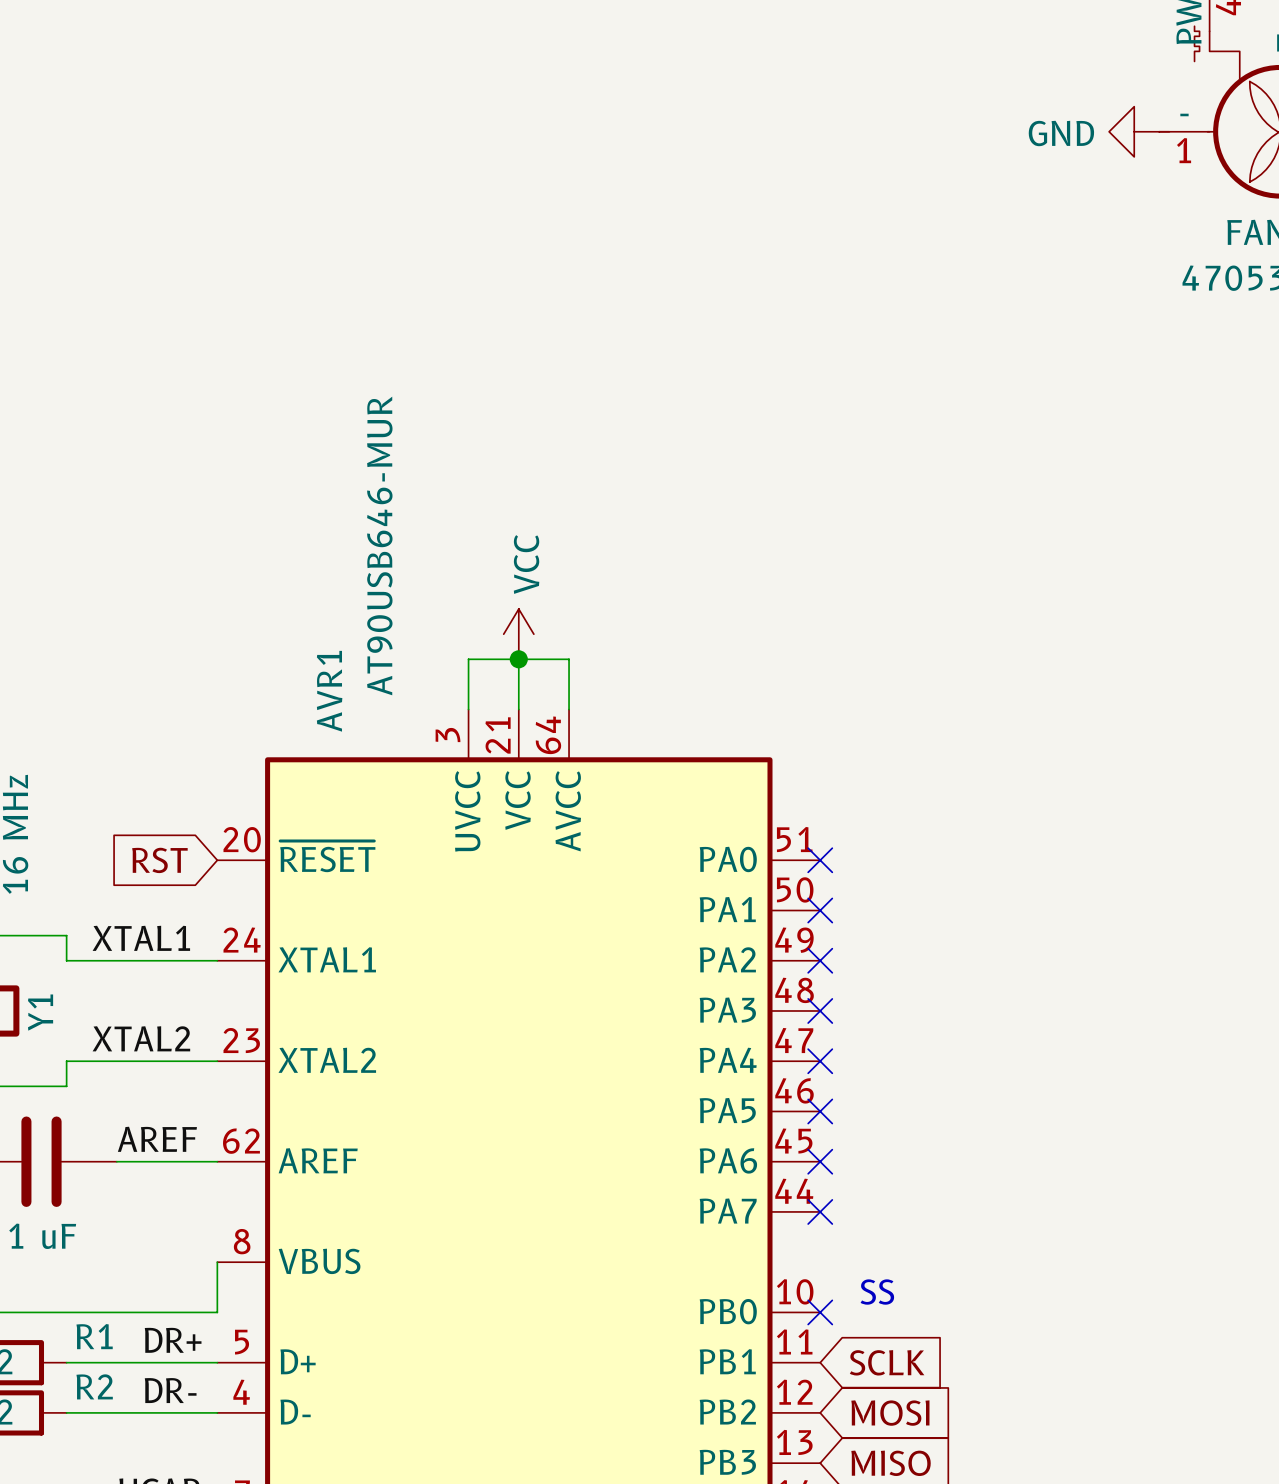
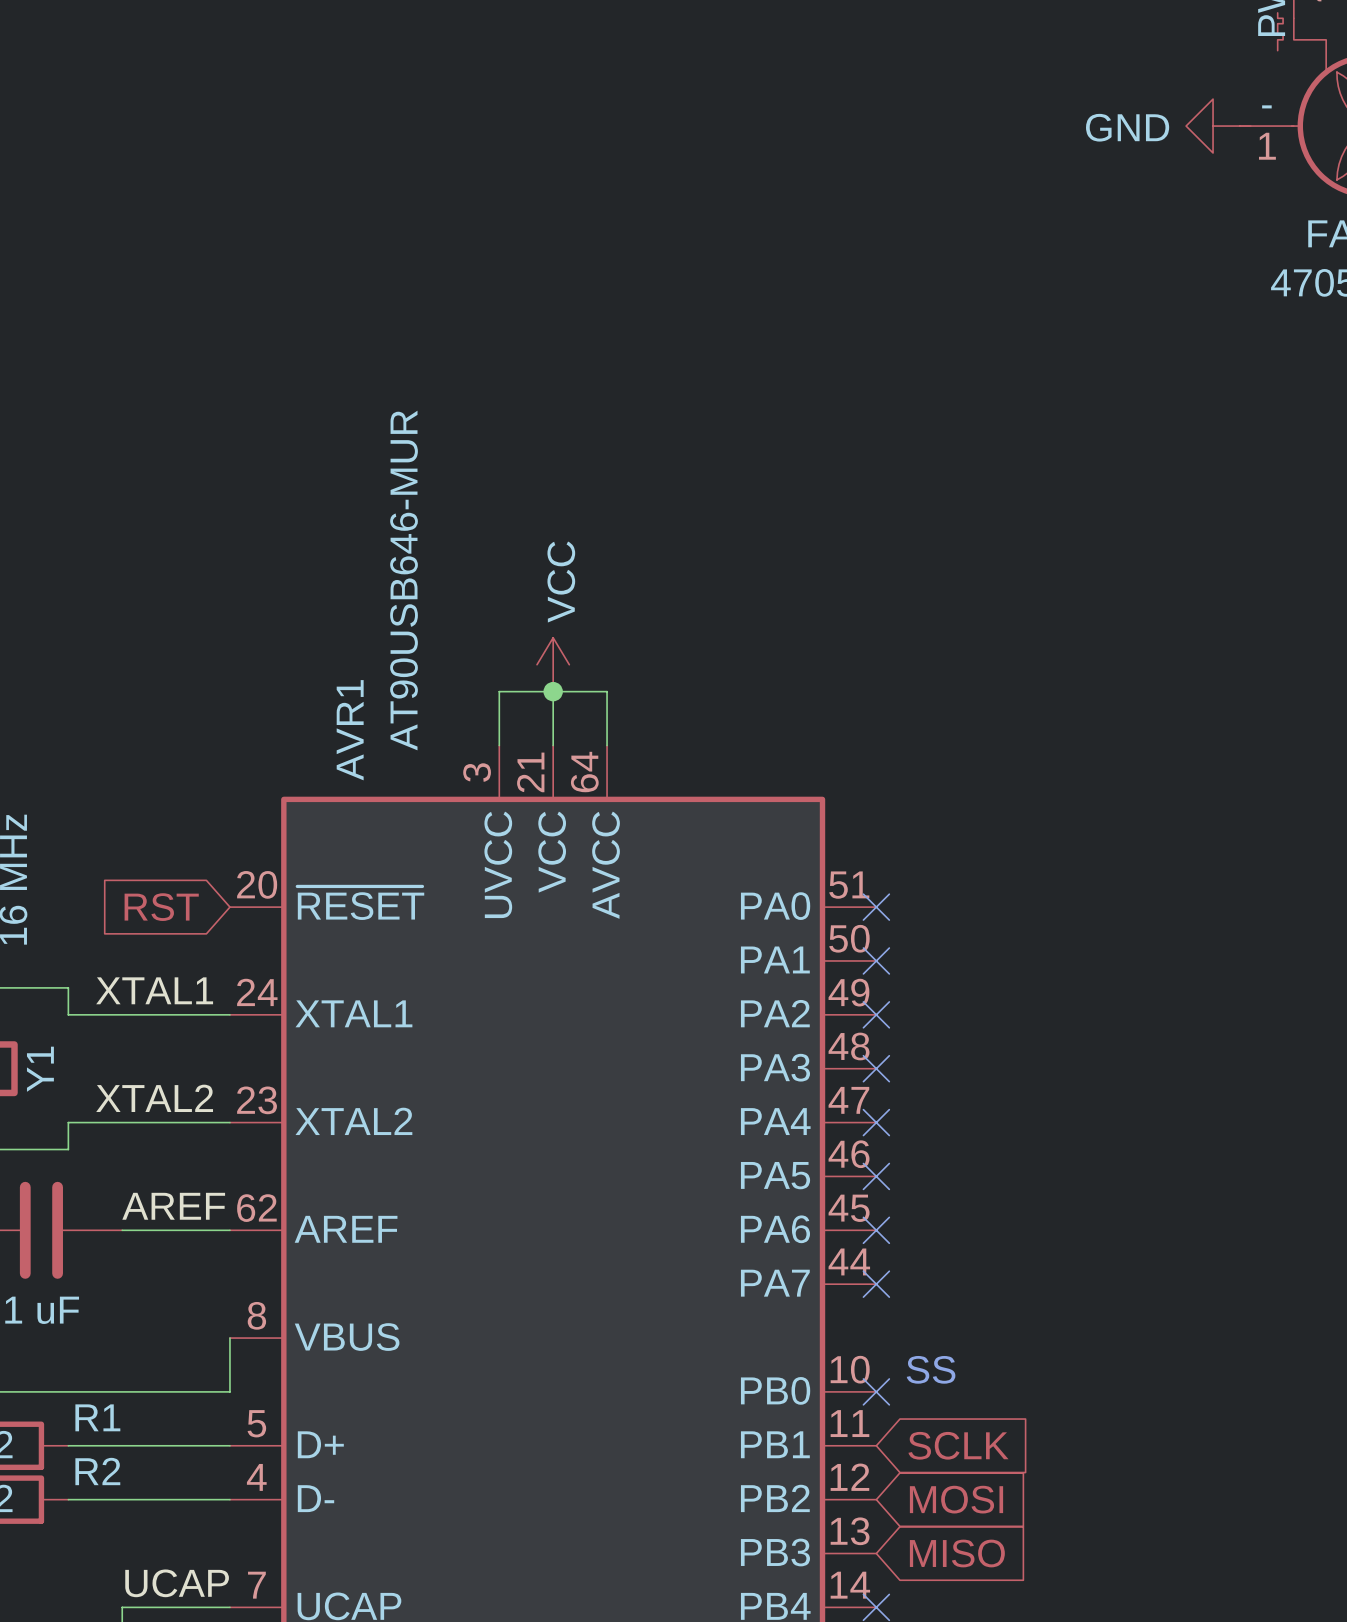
label: DR+ (173, 1340) -> none
label: DR- (170, 1390) -> none

